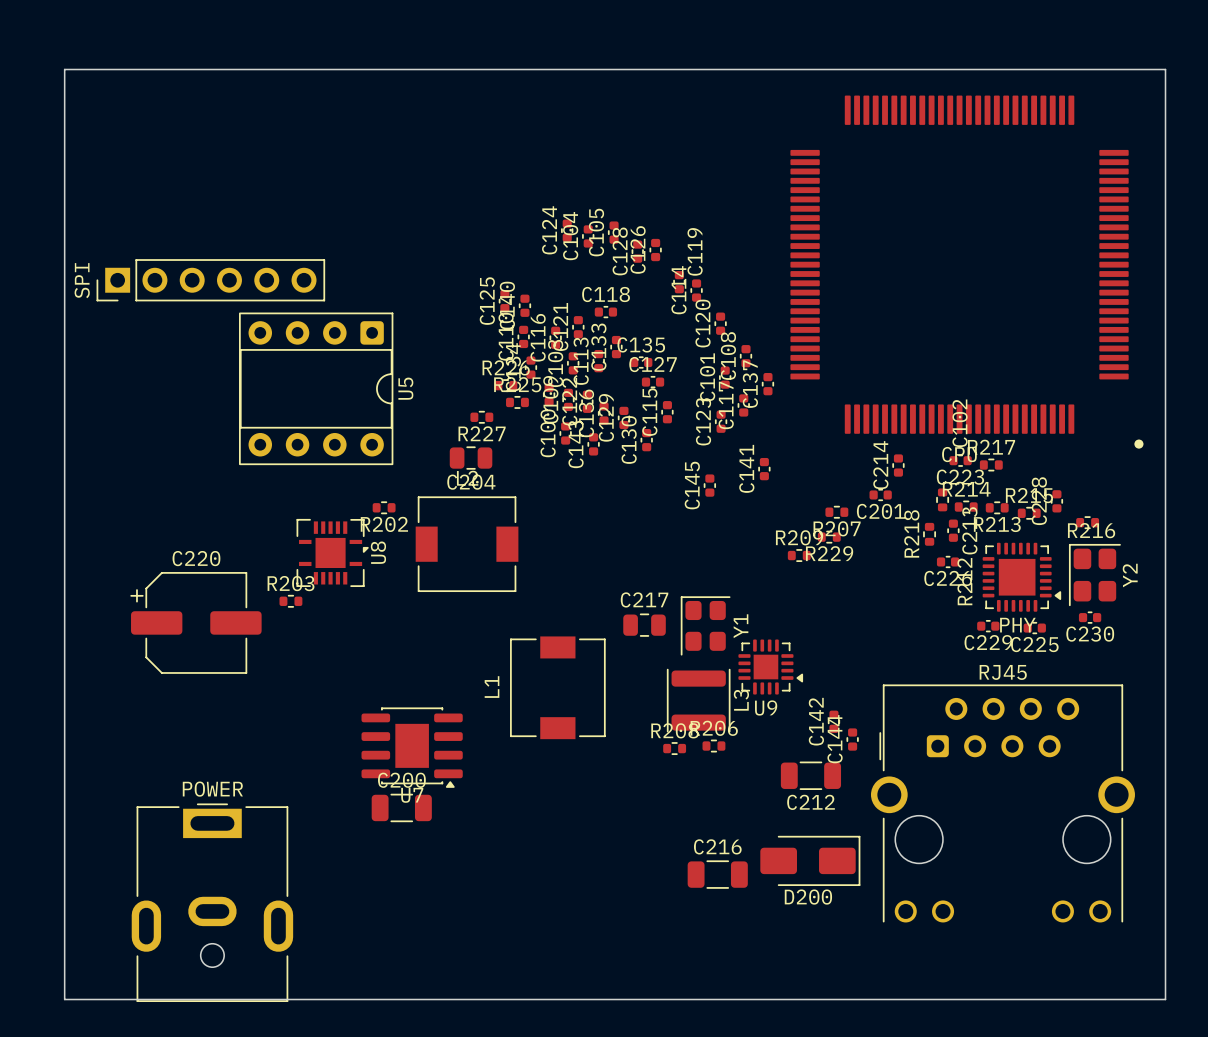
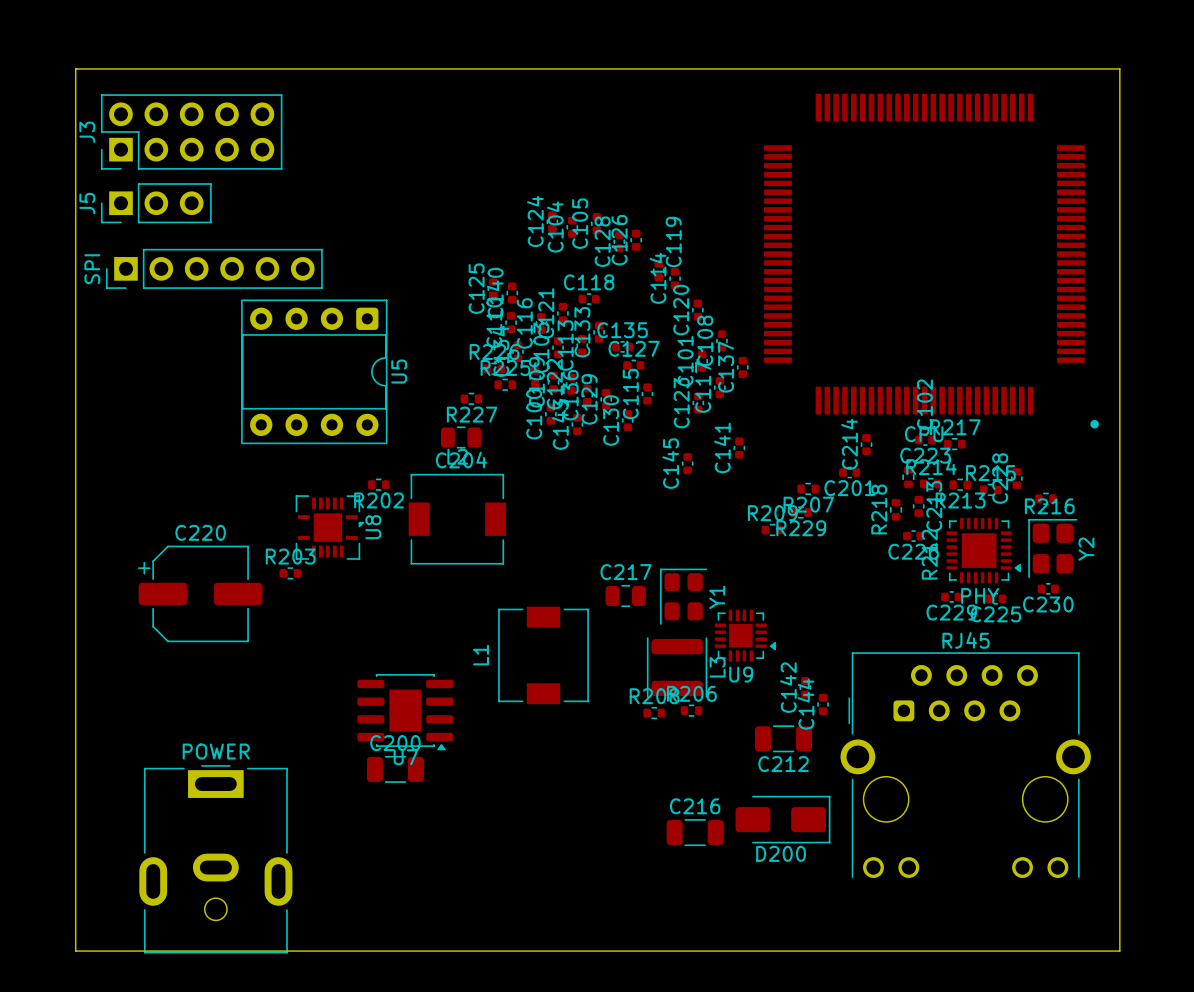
J3: none -> (191, 131)
J5: none -> (156, 203)

